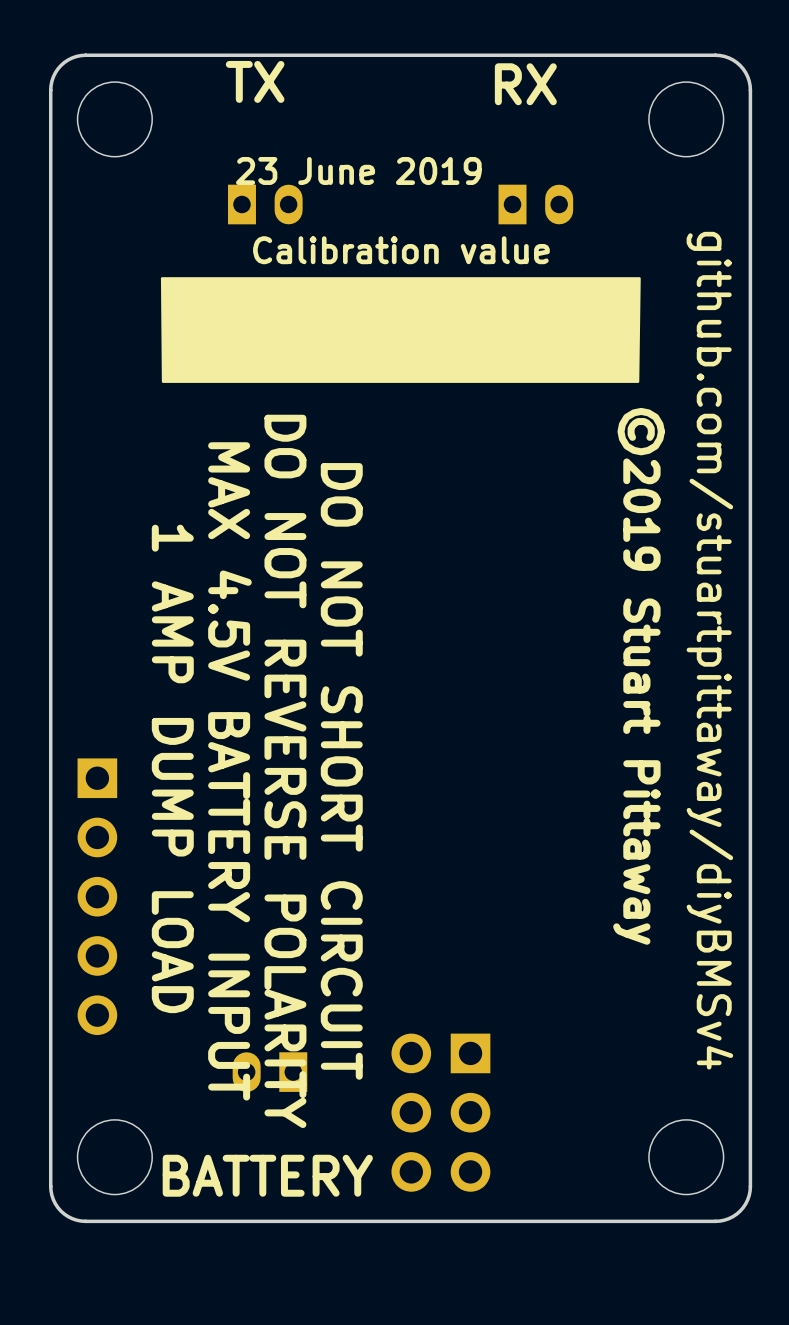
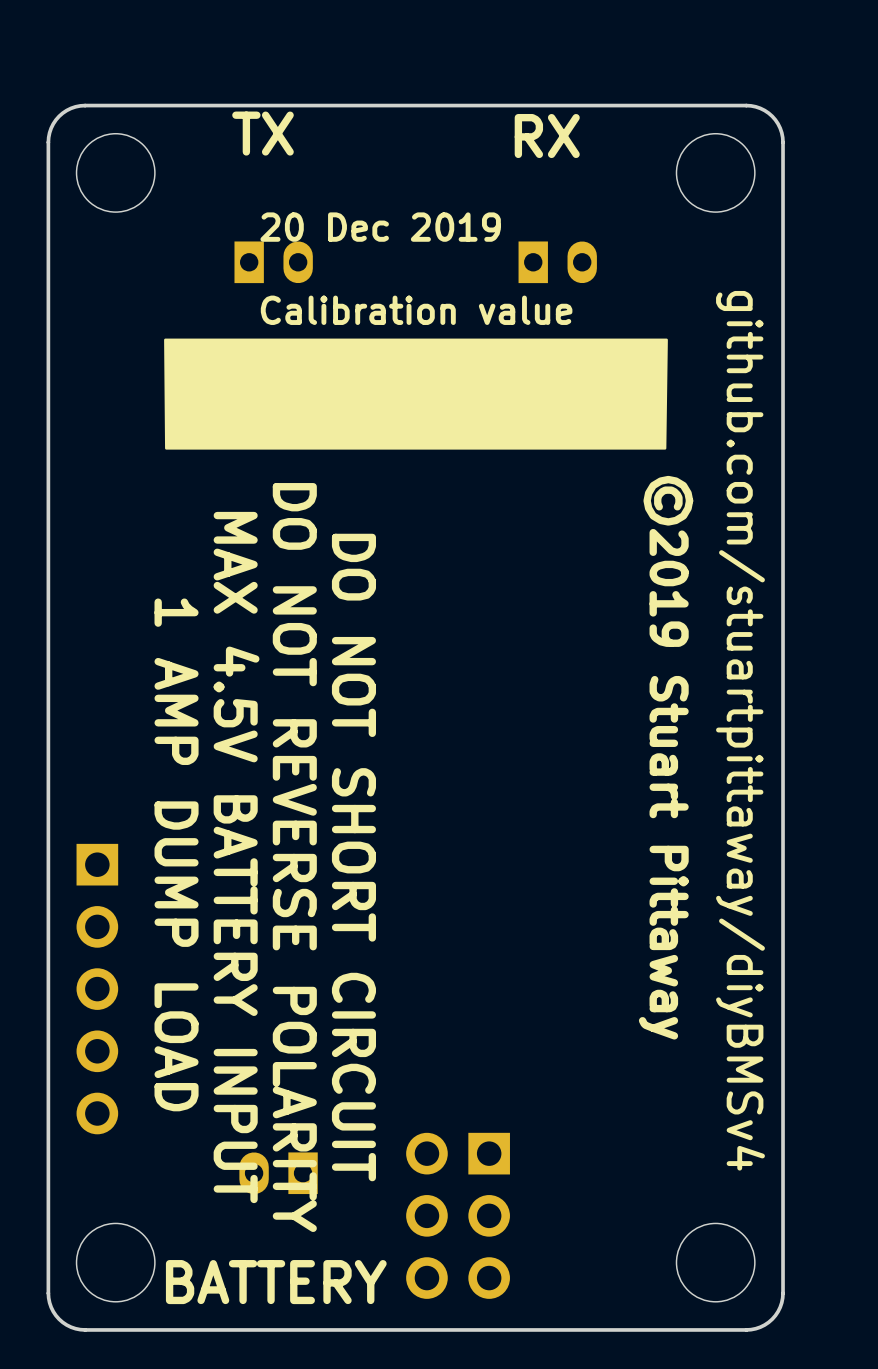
text: 23 June 2019 (358, 170) -> 20 Dec 2019 (380, 227)

